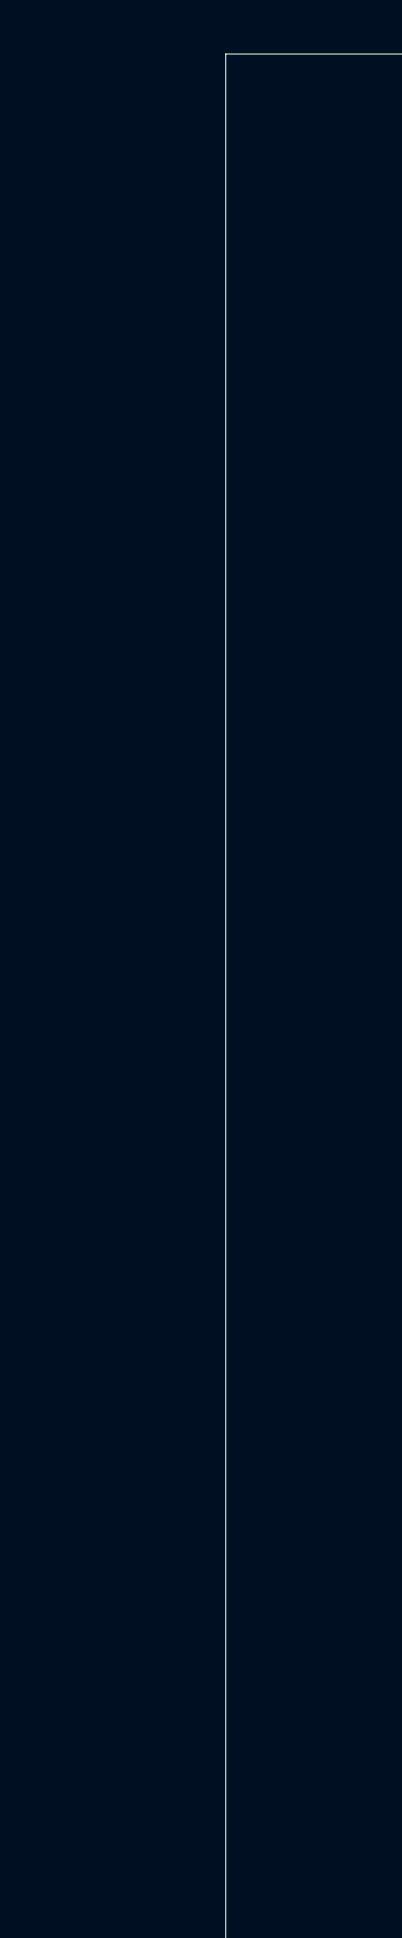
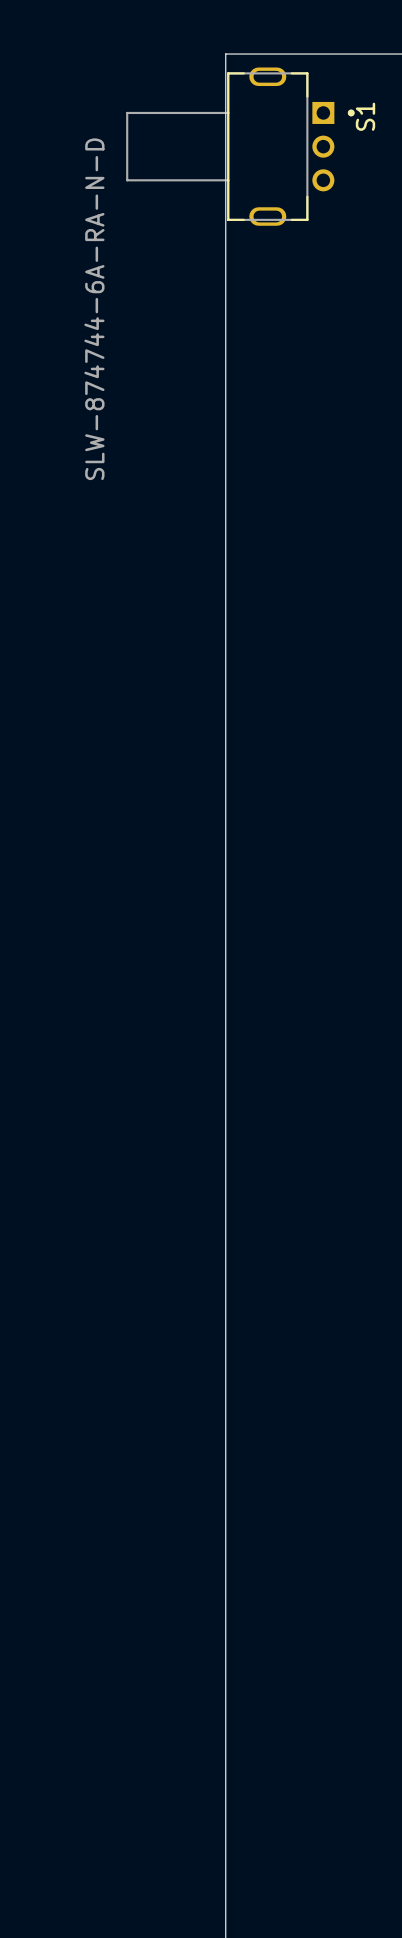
S1: none -> SLW-874744-6A-RA-N-D (240, 146)

